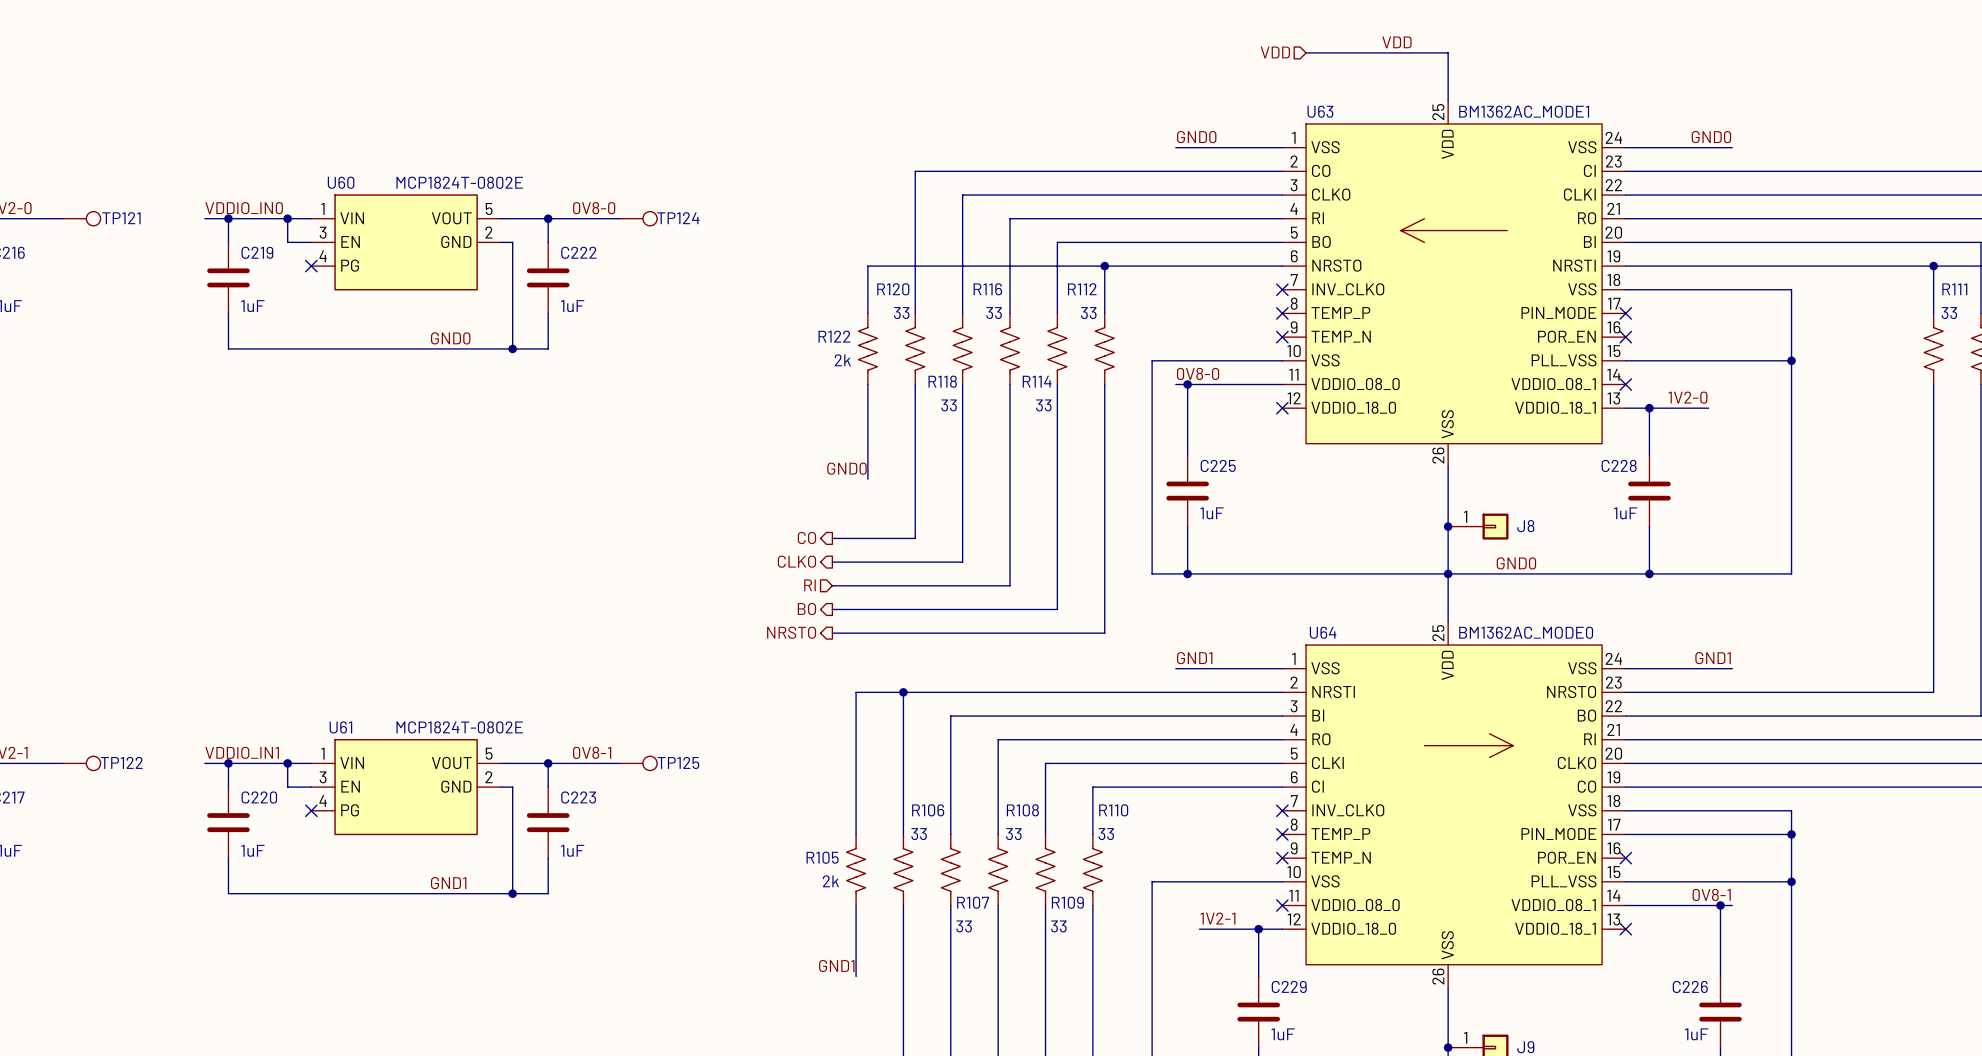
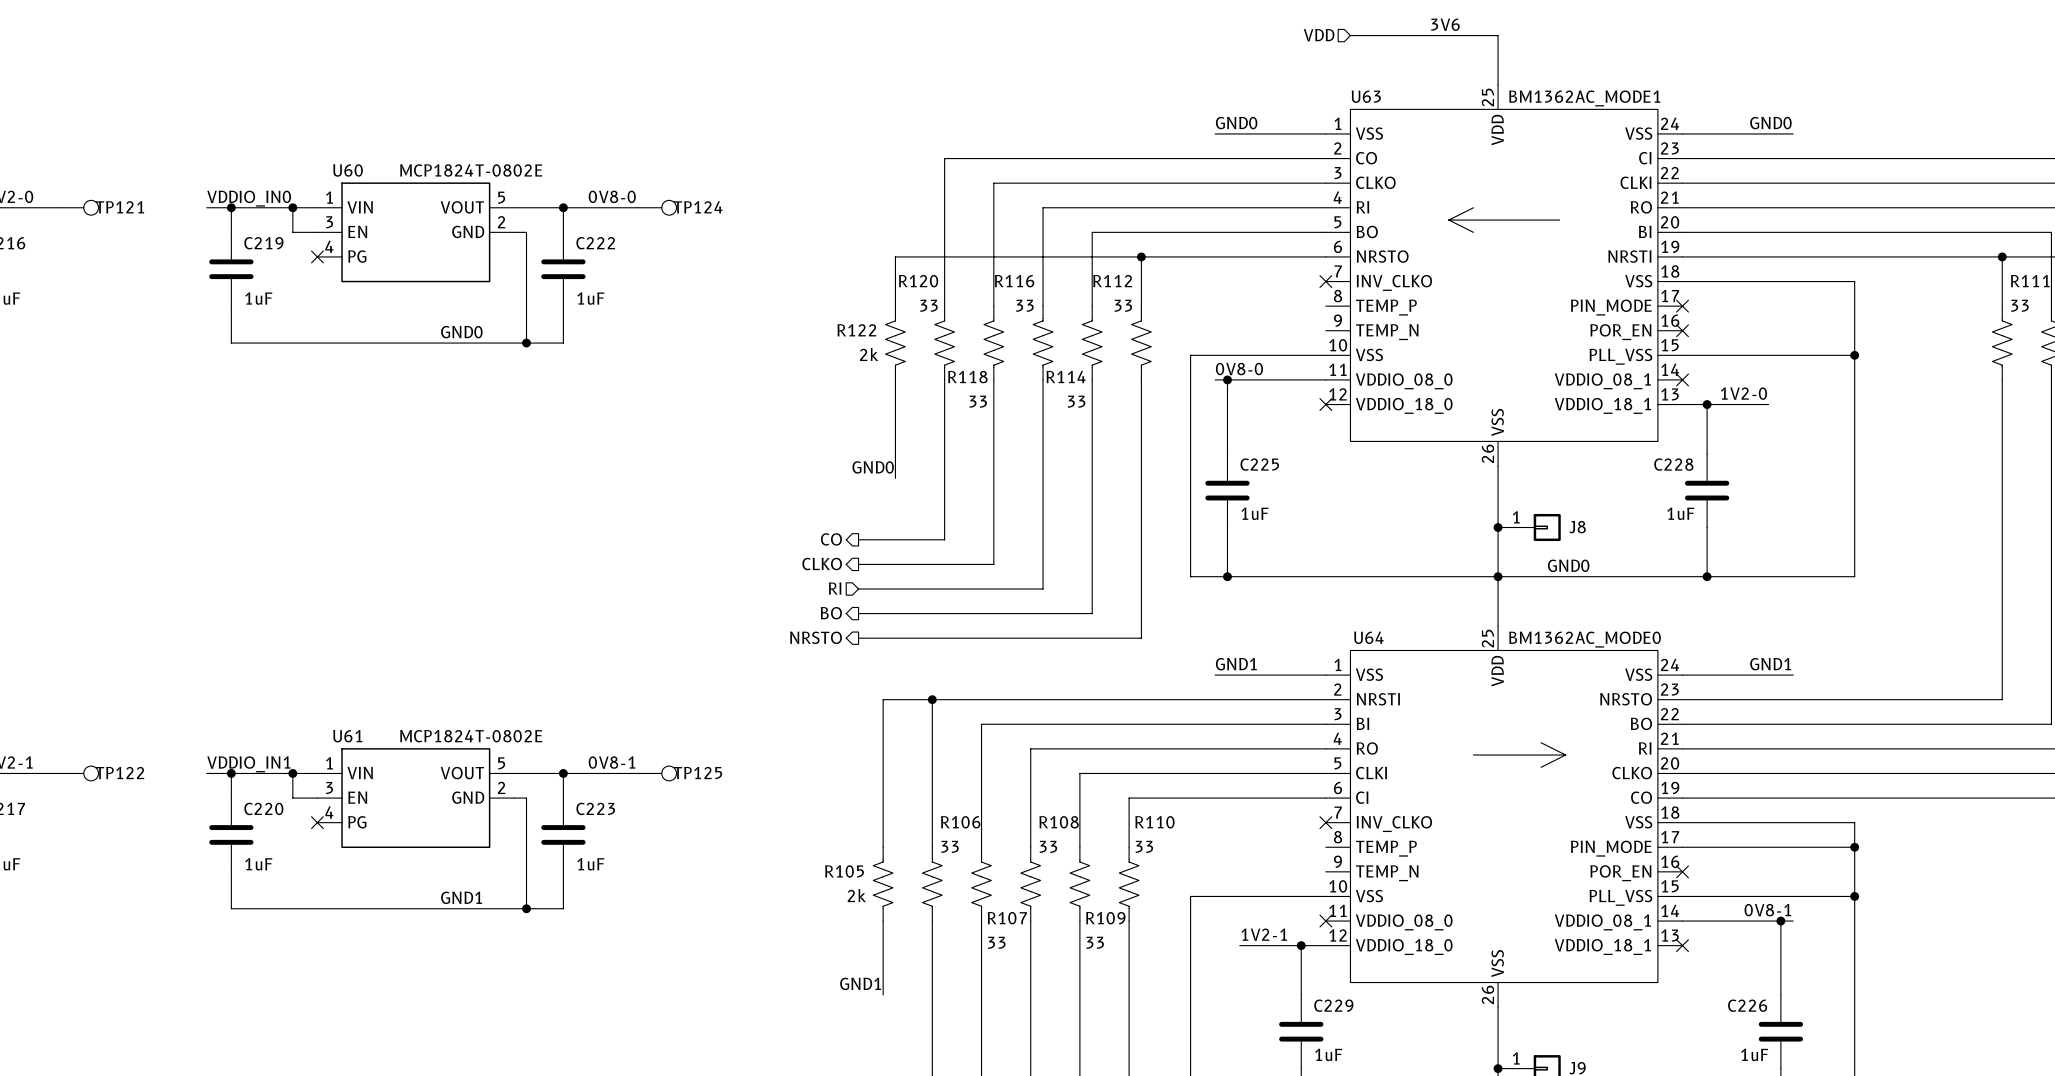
label: VDD (1396, 42) -> 3V6 (1445, 24)
no-connect mark: (1282, 313) -> none
no-connect mark: (1282, 337) -> none
no-connect mark: (1282, 834) -> none
no-connect mark: (1282, 858) -> none

